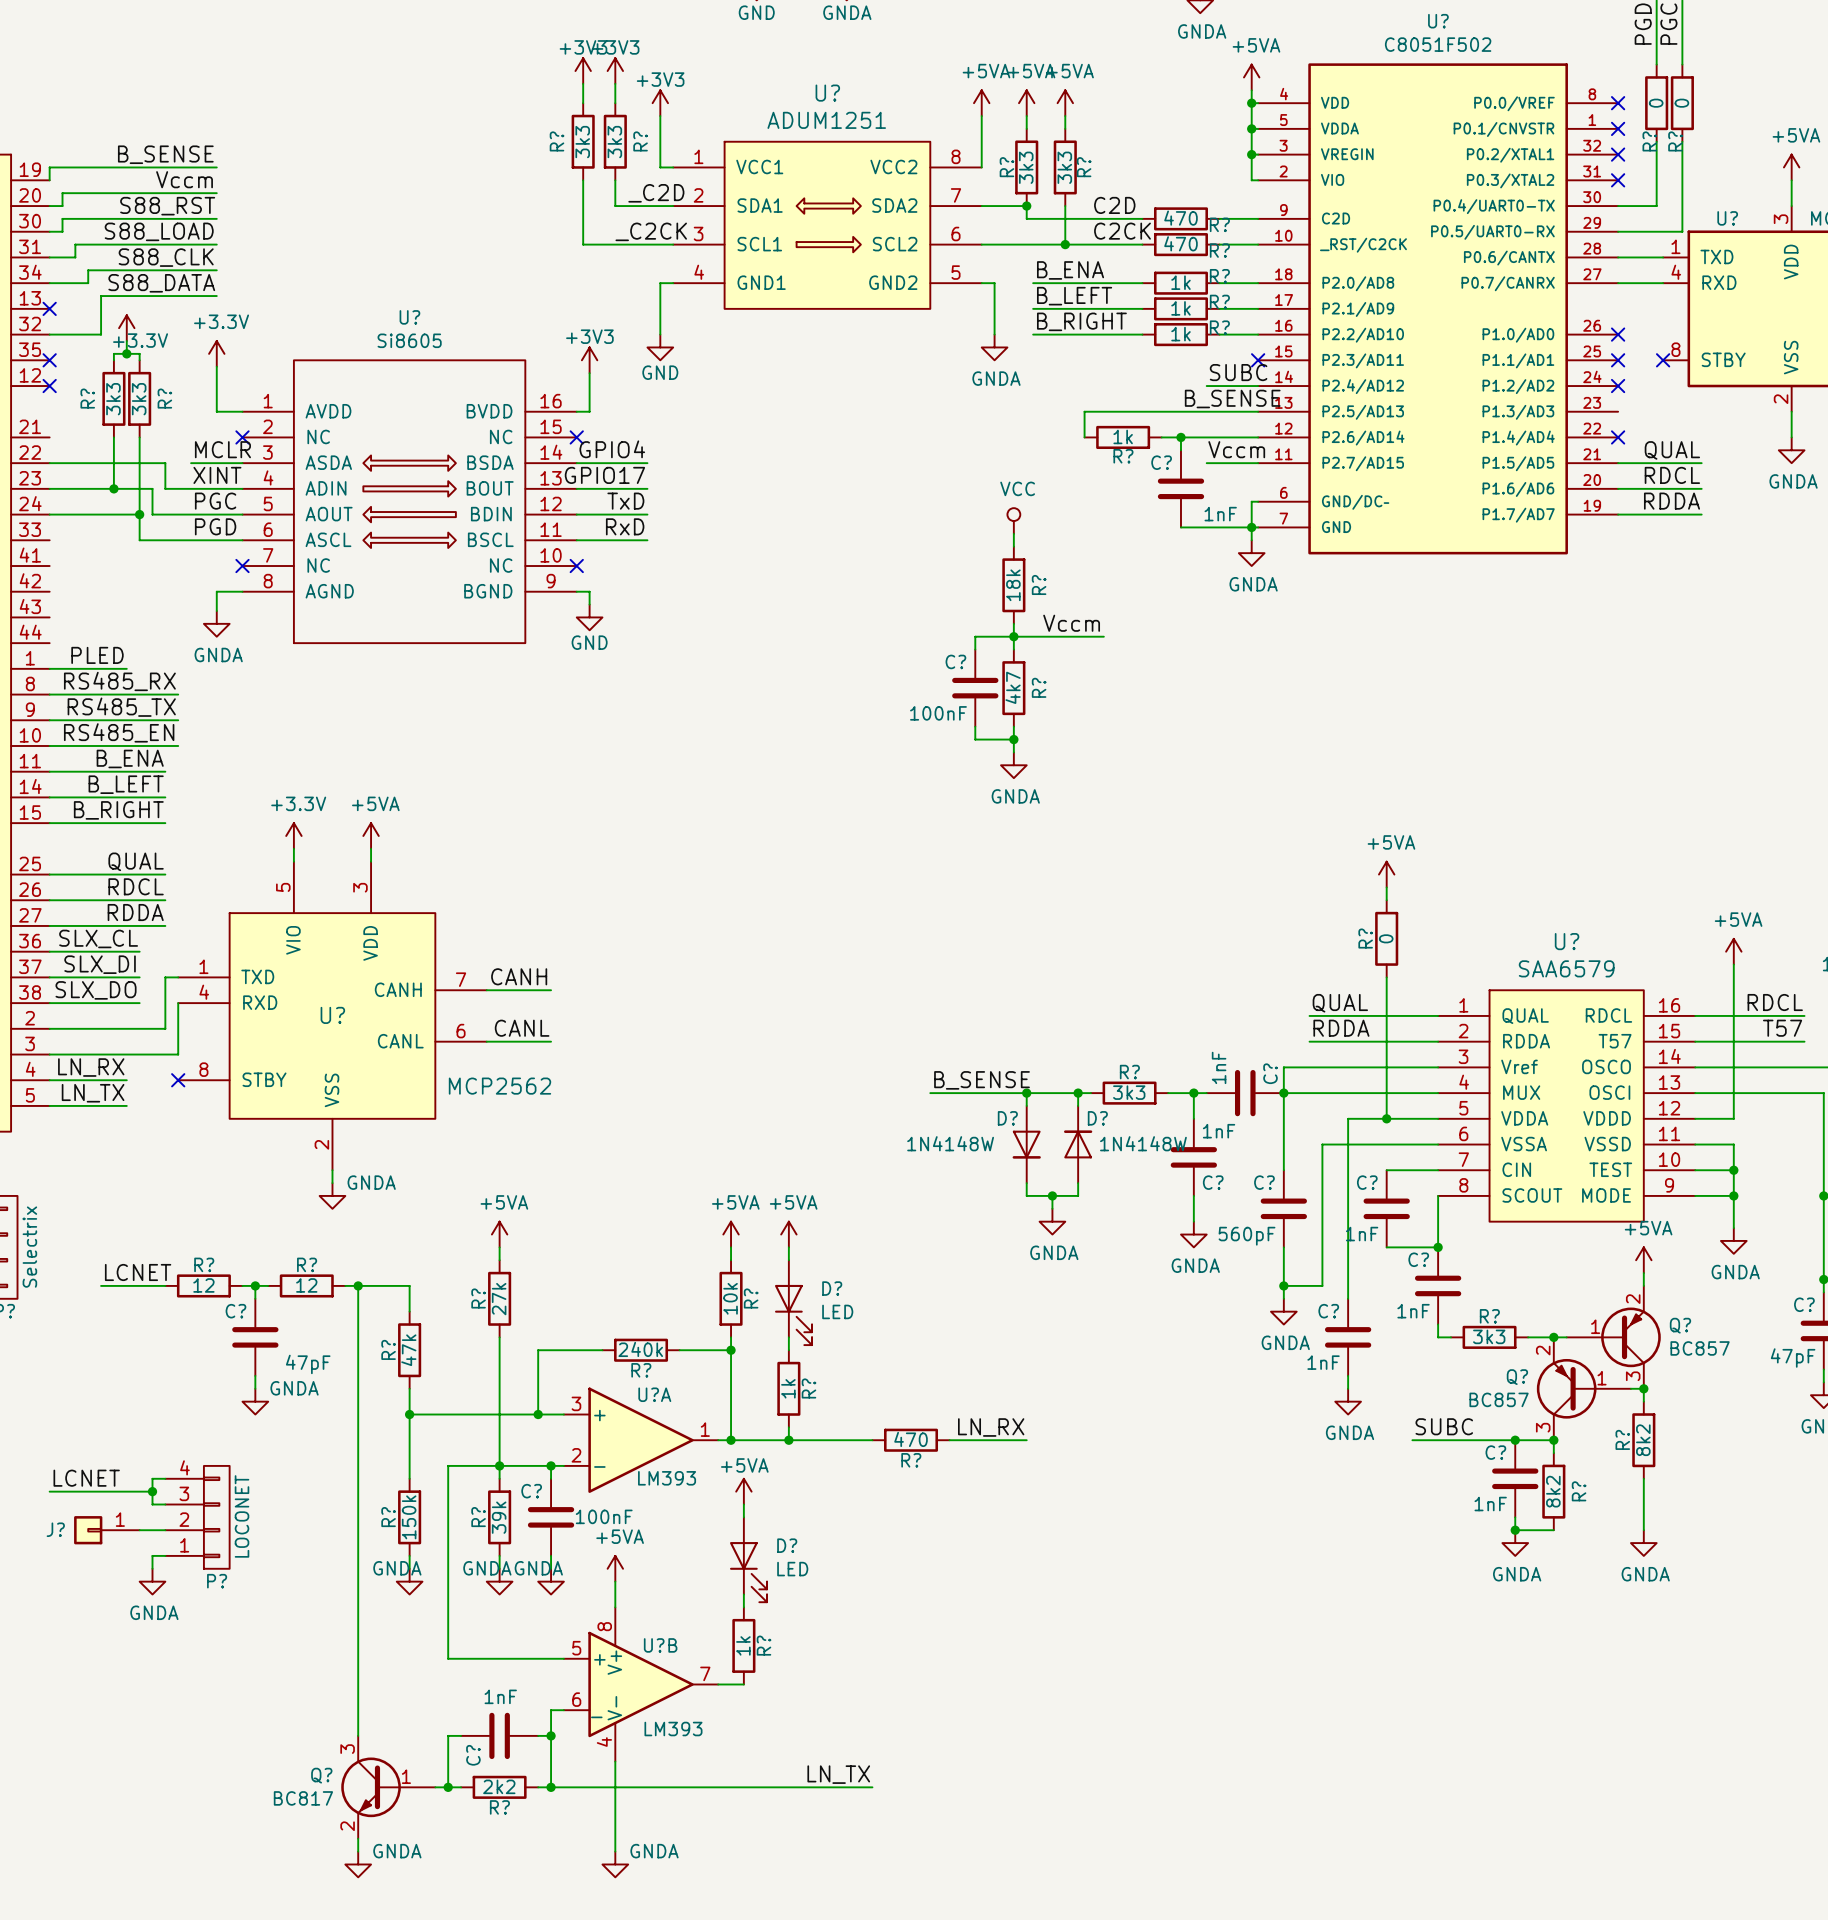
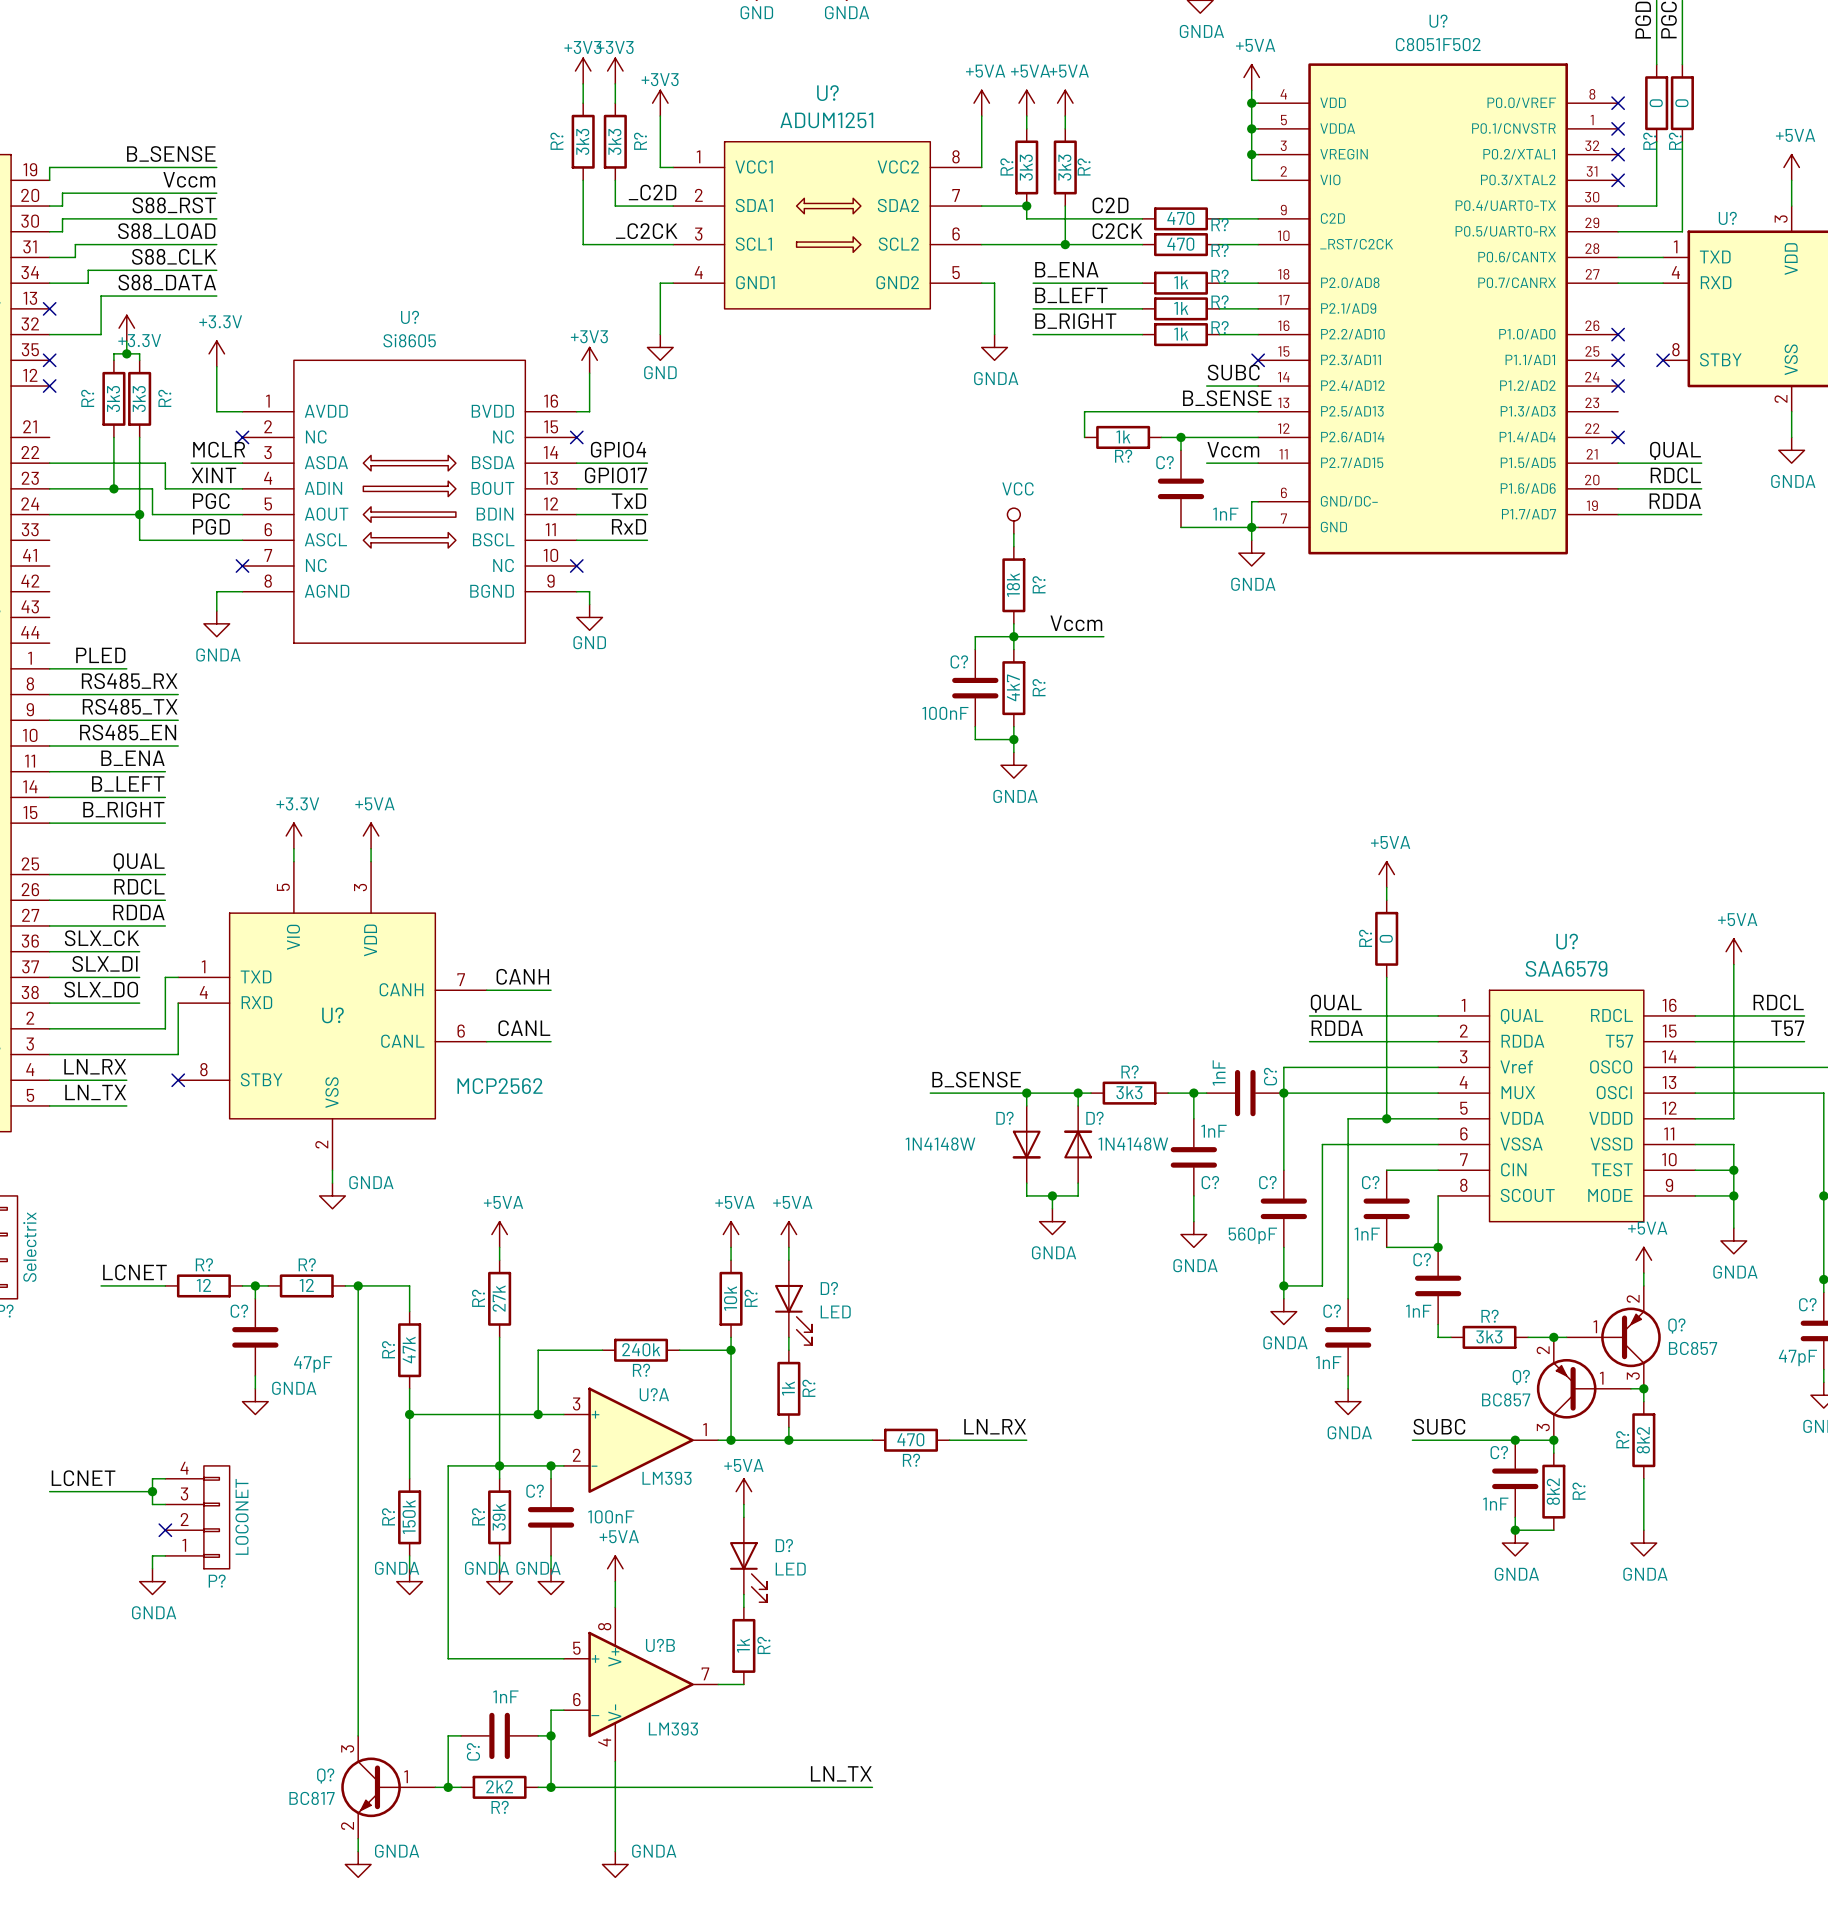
label: SLX_CL (98, 938) -> SLX_CK (101, 938)
J?: (106, 1530) -> none
wire: (139, 1530) (165, 1530) -> none
no-connect mark: none -> (165, 1530)

